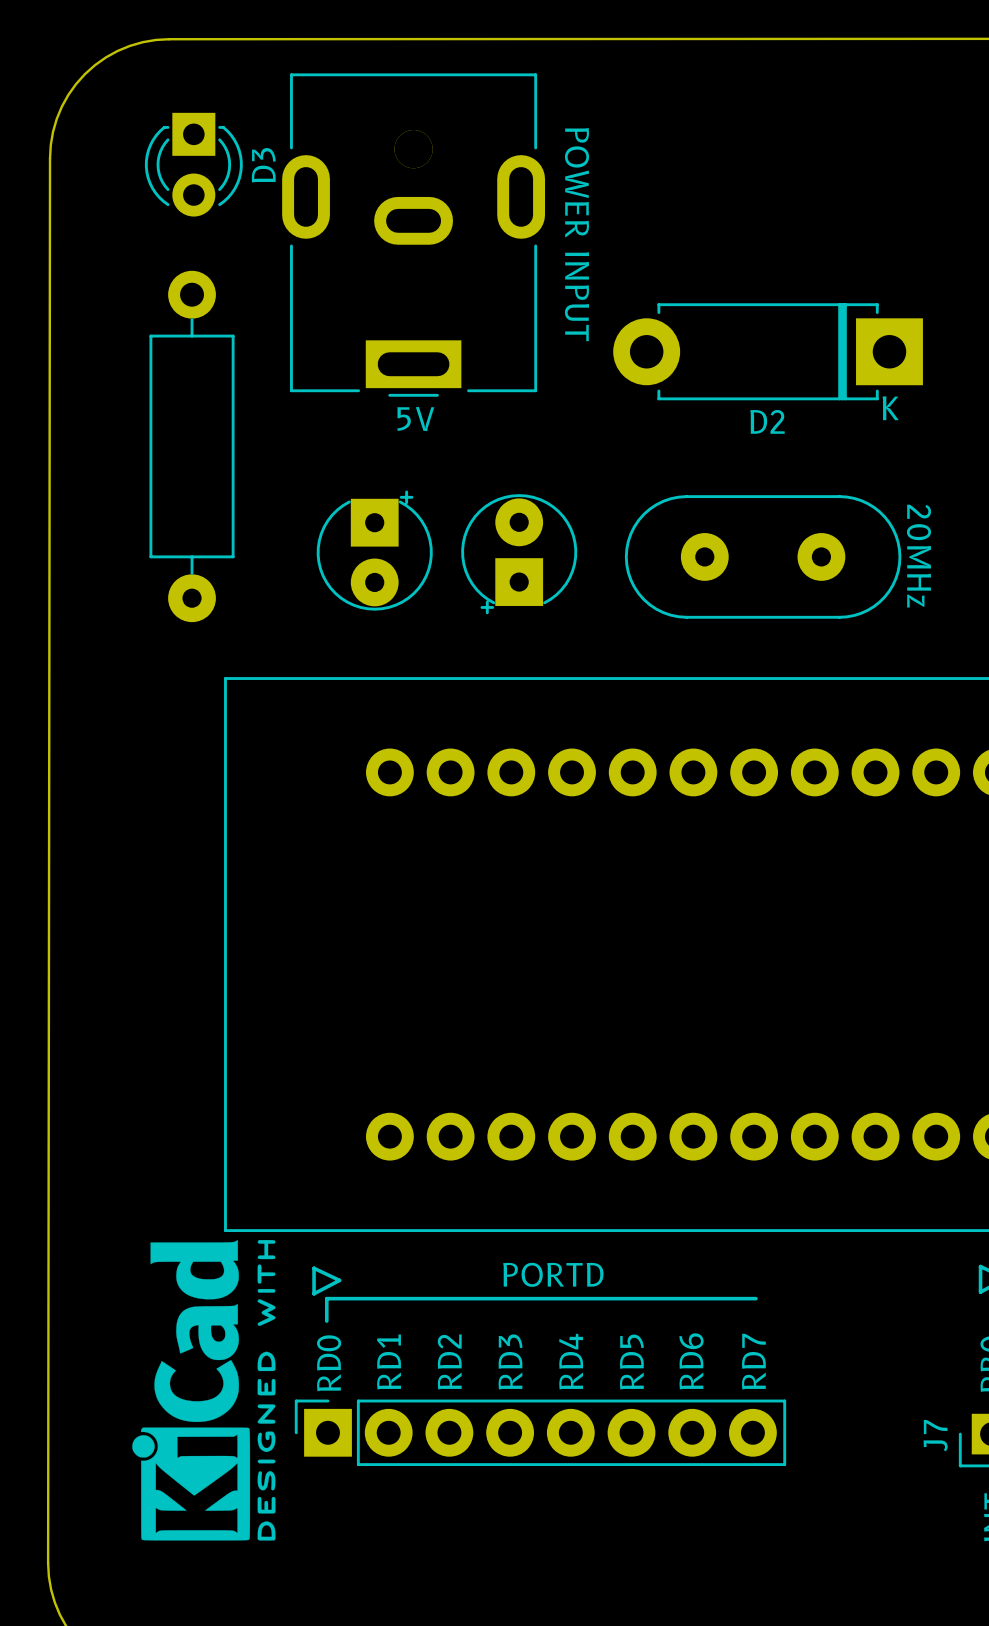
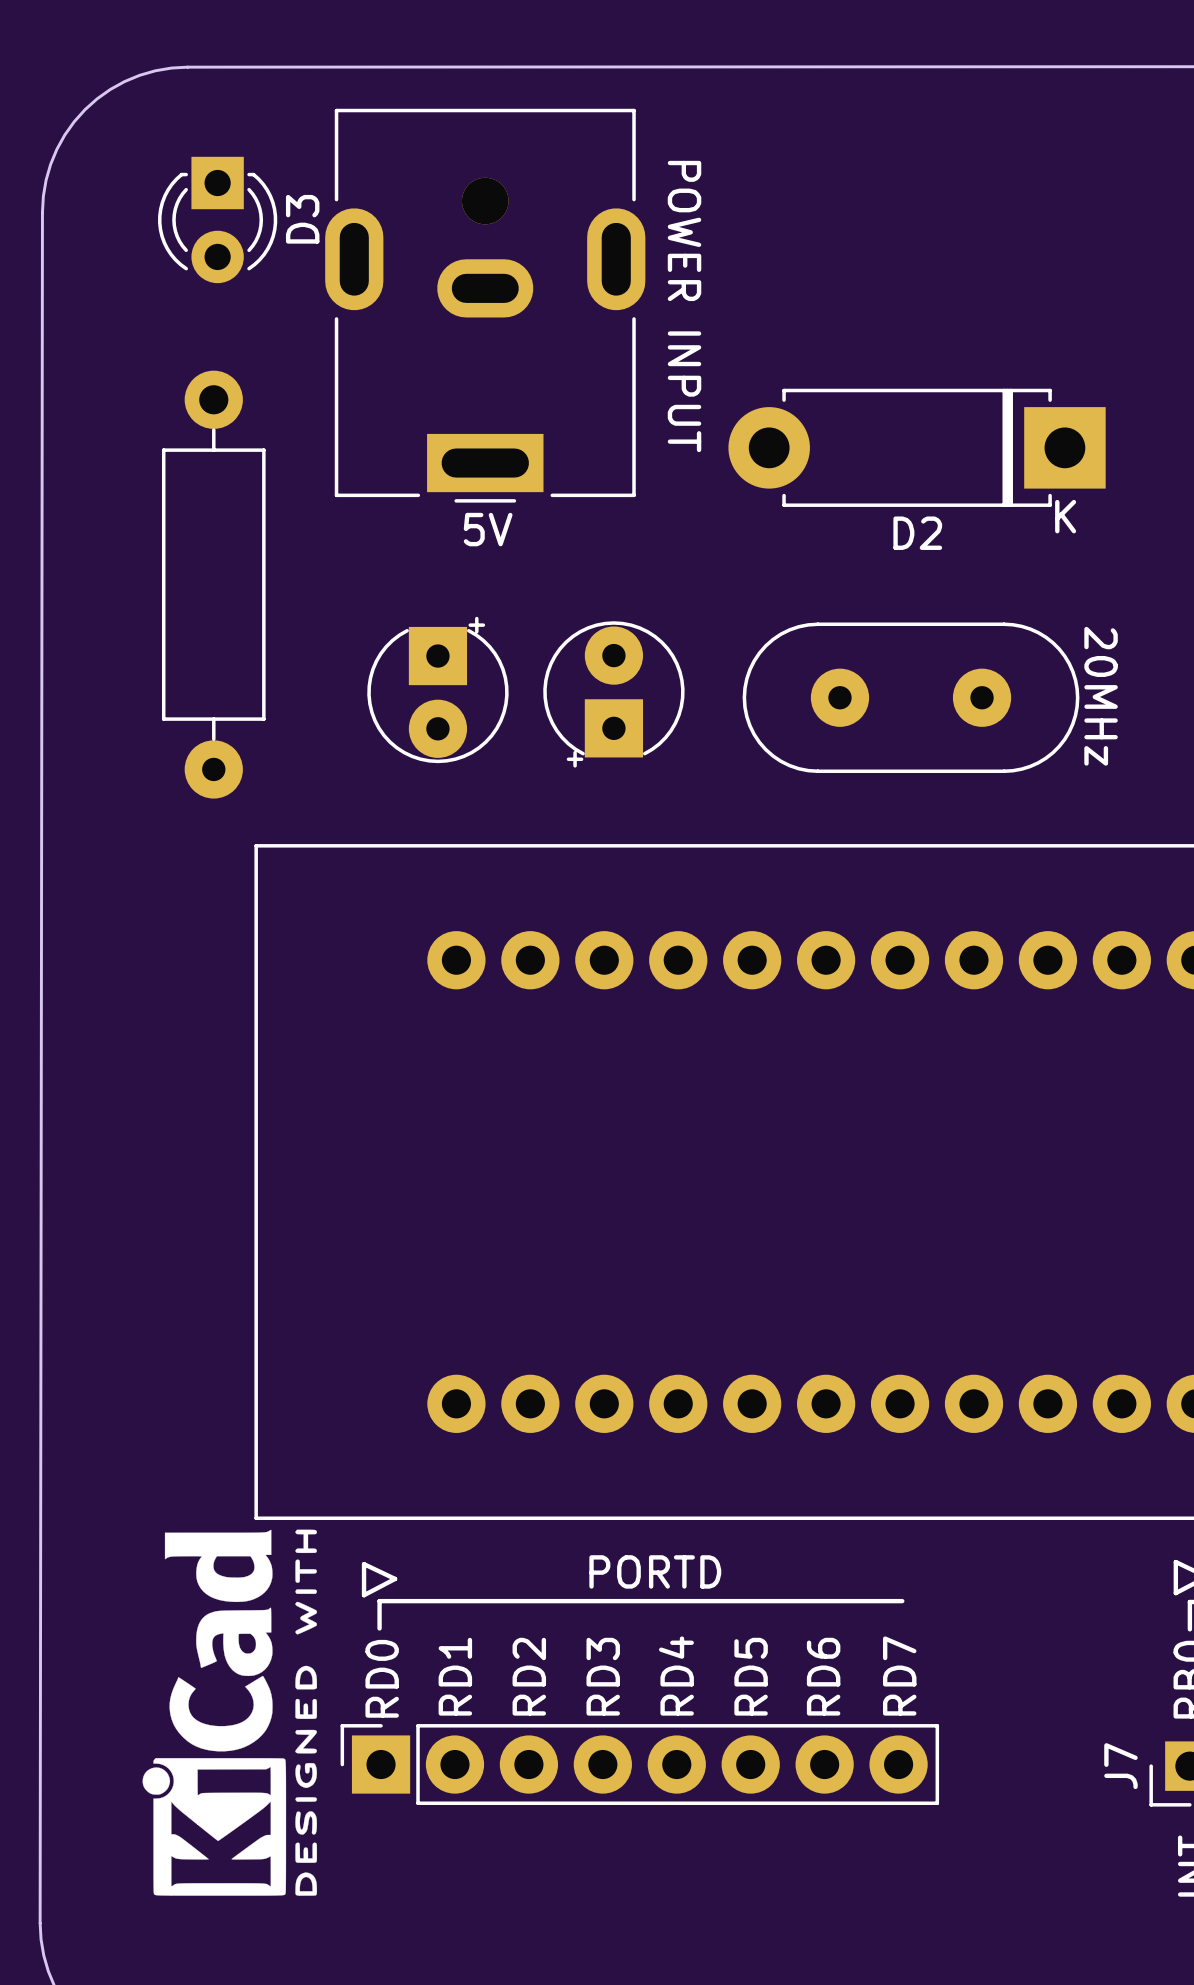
part position: (192, 446) -> (213, 584)

